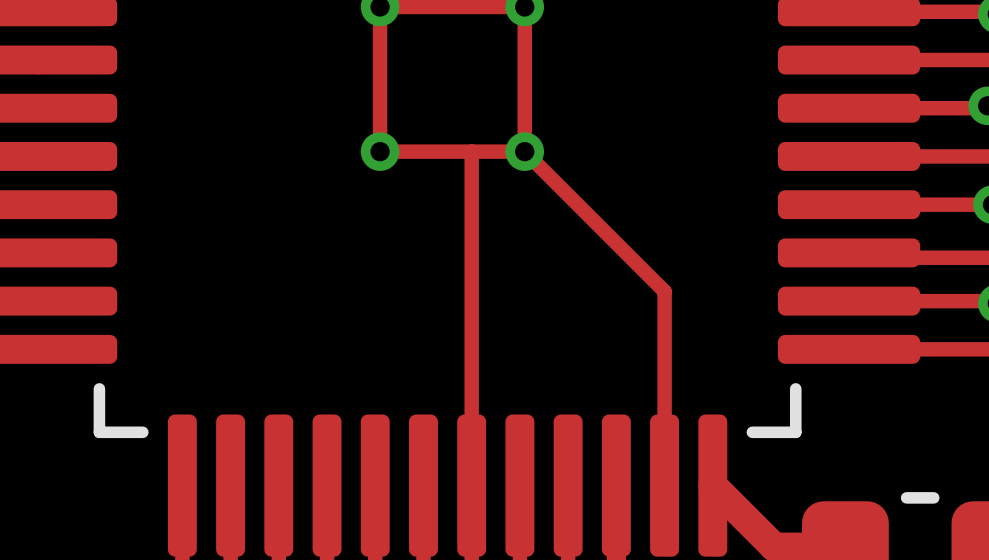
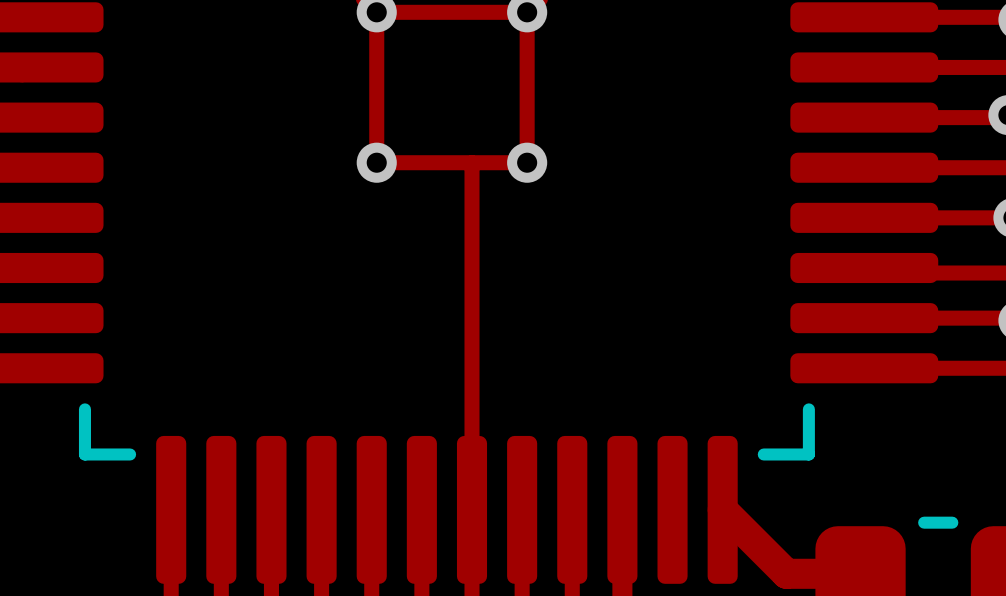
top track: (524, 151) (664, 291) (664, 485) -> none

